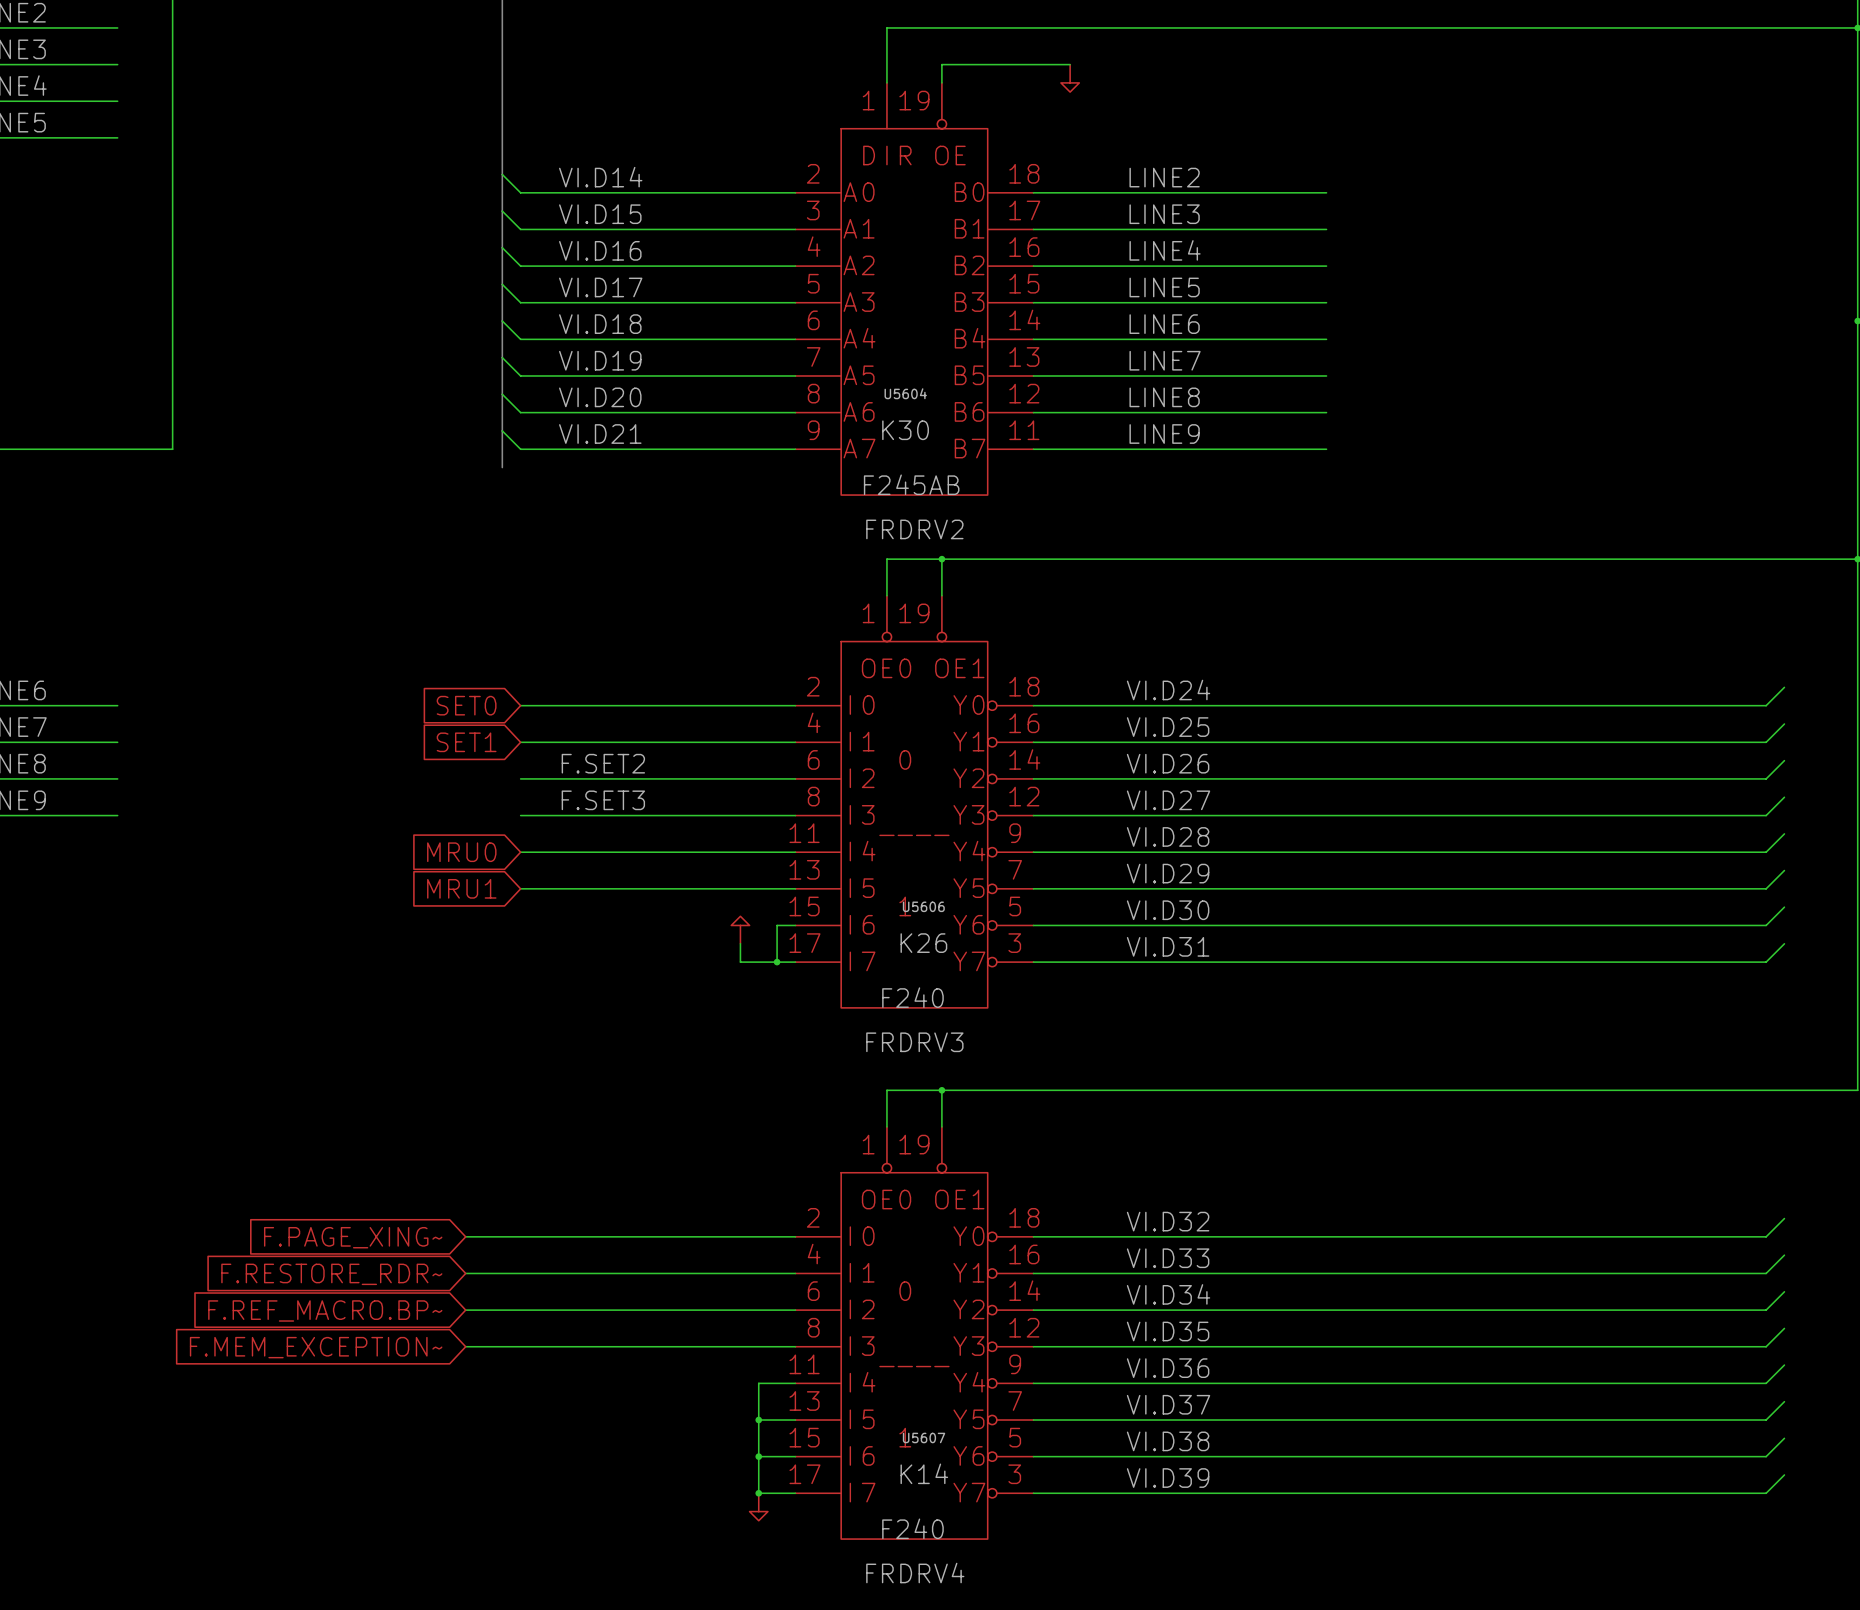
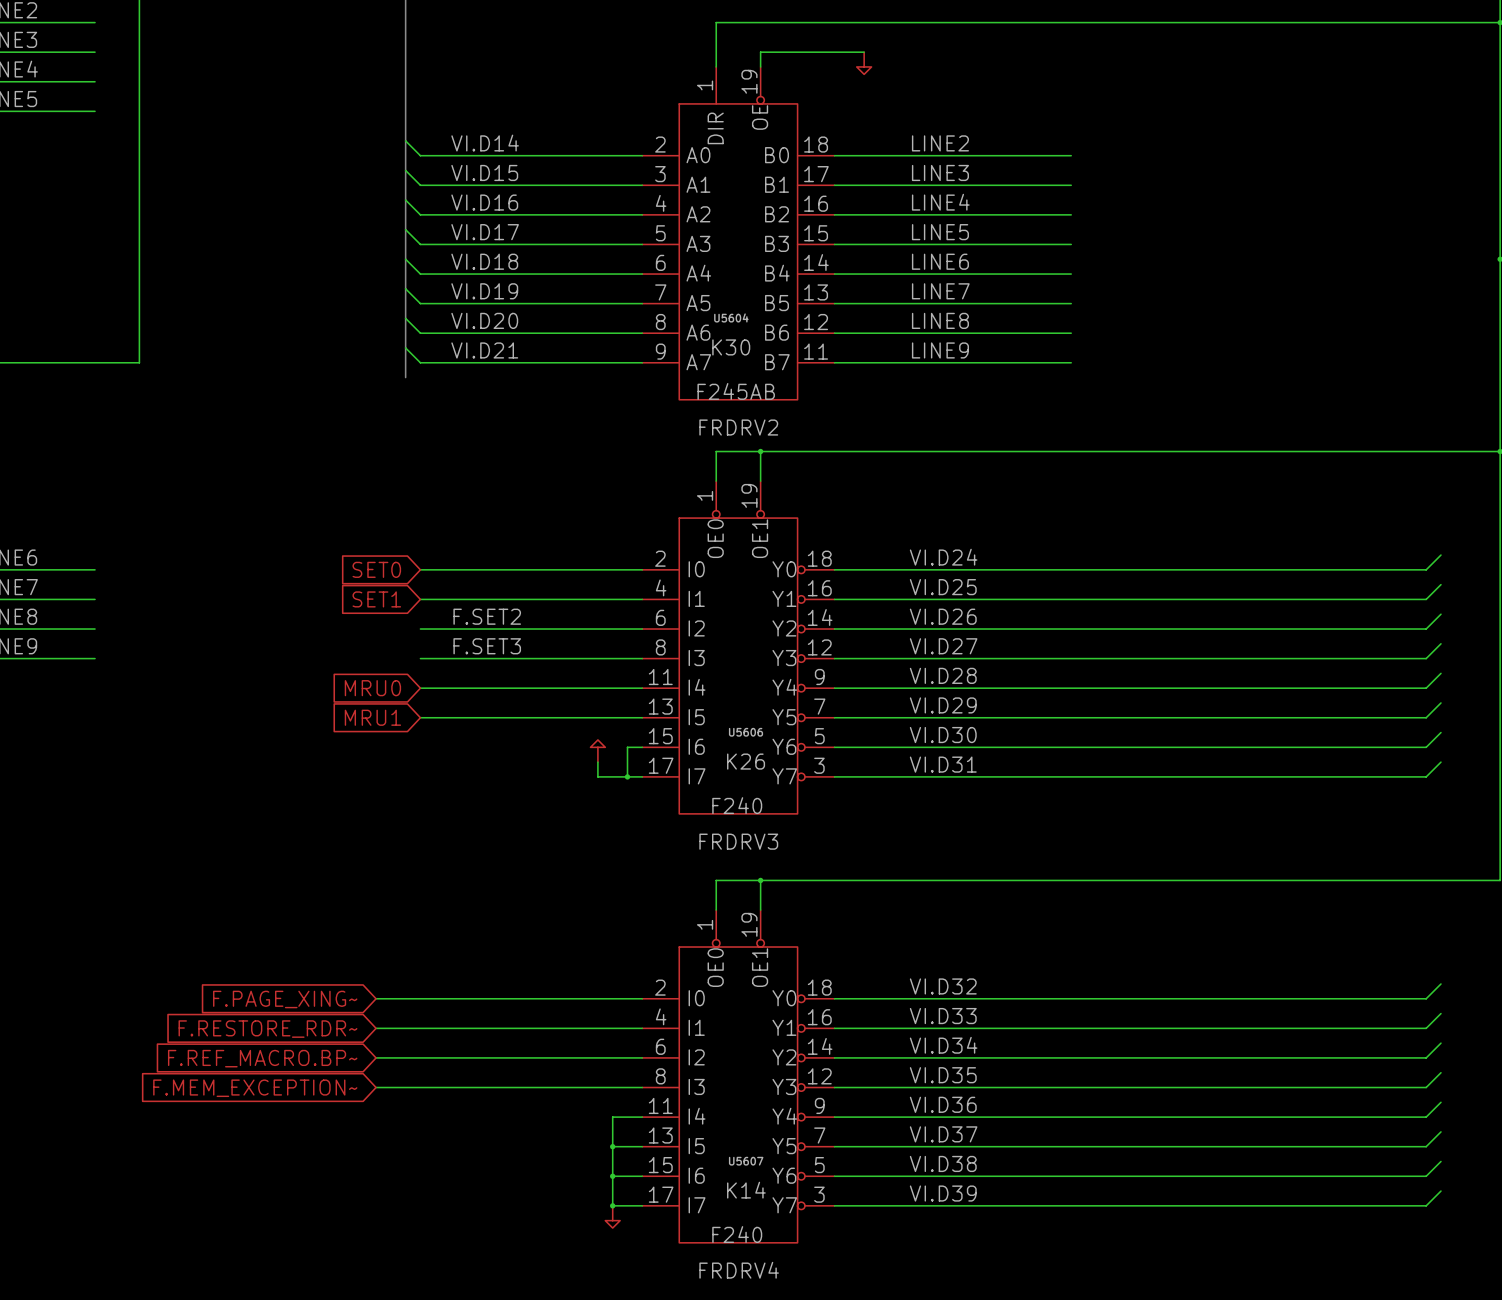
U5604 symbol: [795, 82, 1034, 496] -> [642, 66, 835, 400]
U5606 symbol: [795, 595, 1034, 1008] -> [642, 481, 835, 814]
U5607 symbol: [795, 1126, 1034, 1540] -> [642, 910, 835, 1243]

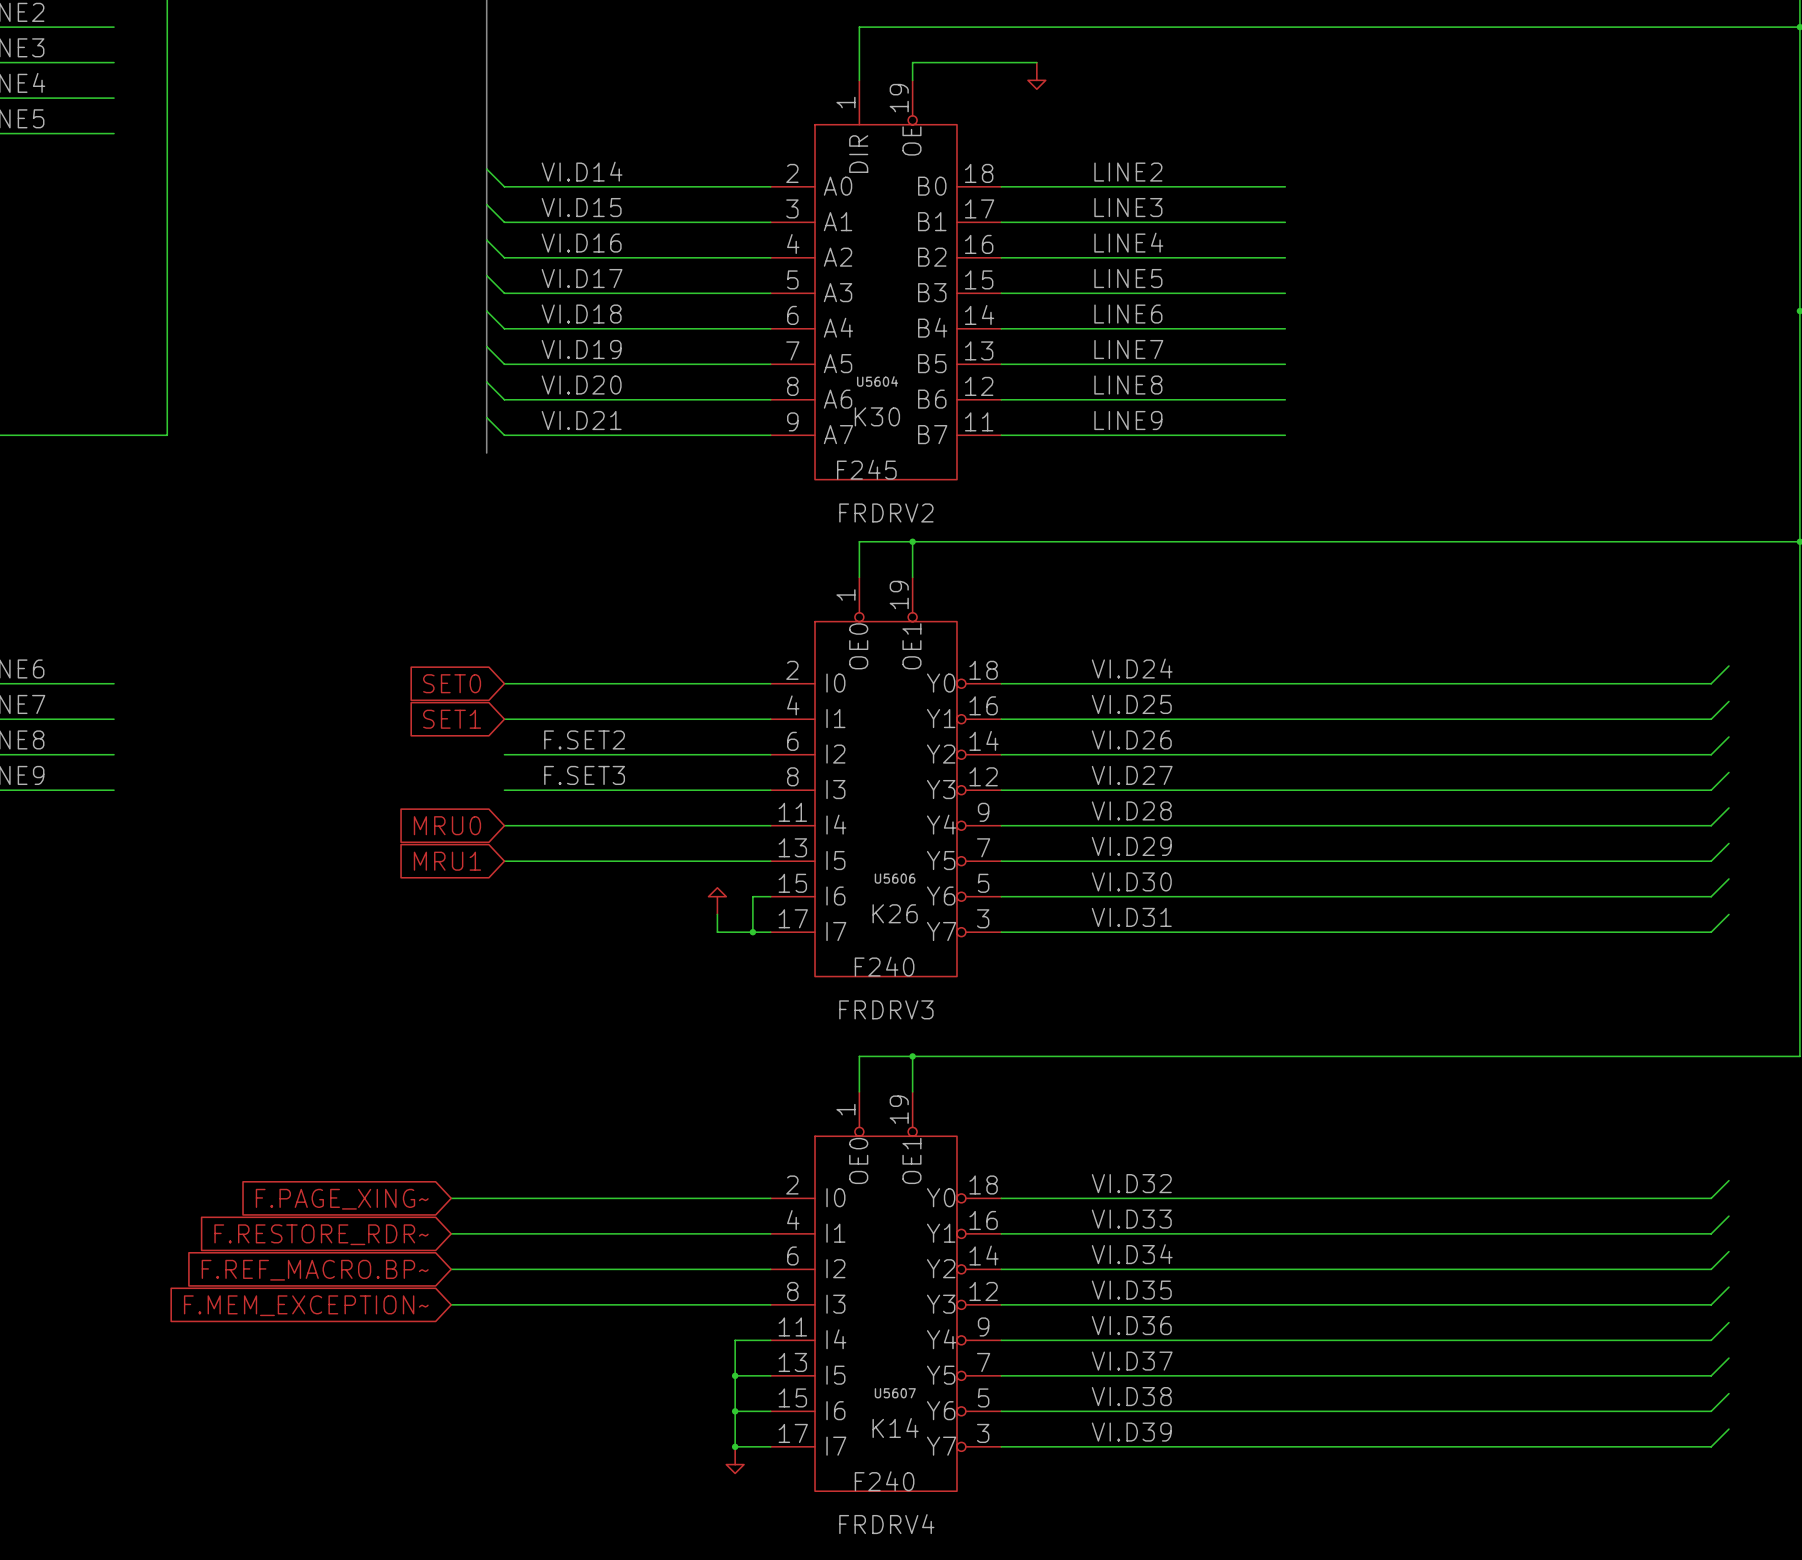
U5604 value: F245AB (736, 391) -> F245 (866, 469)

